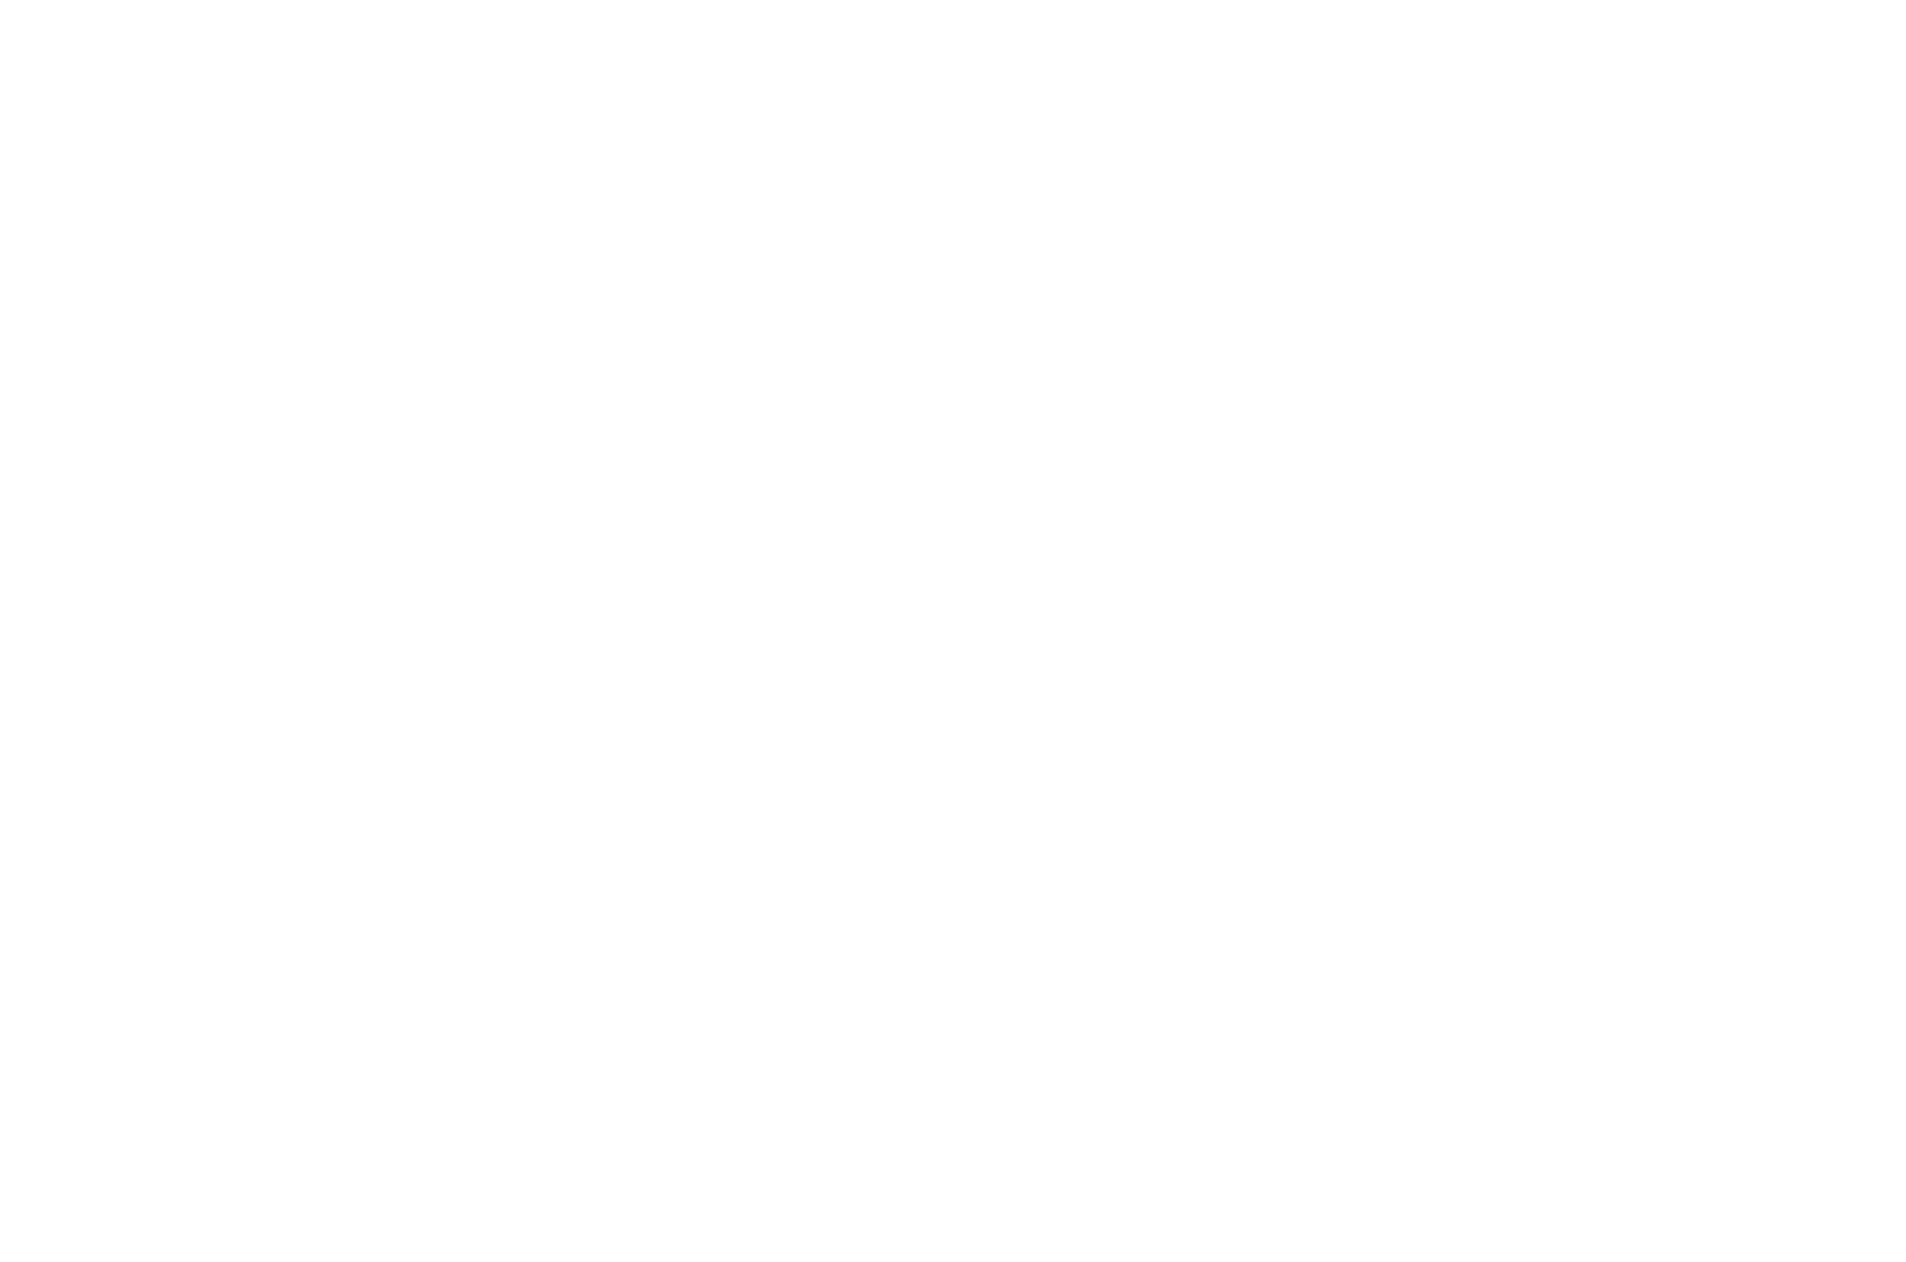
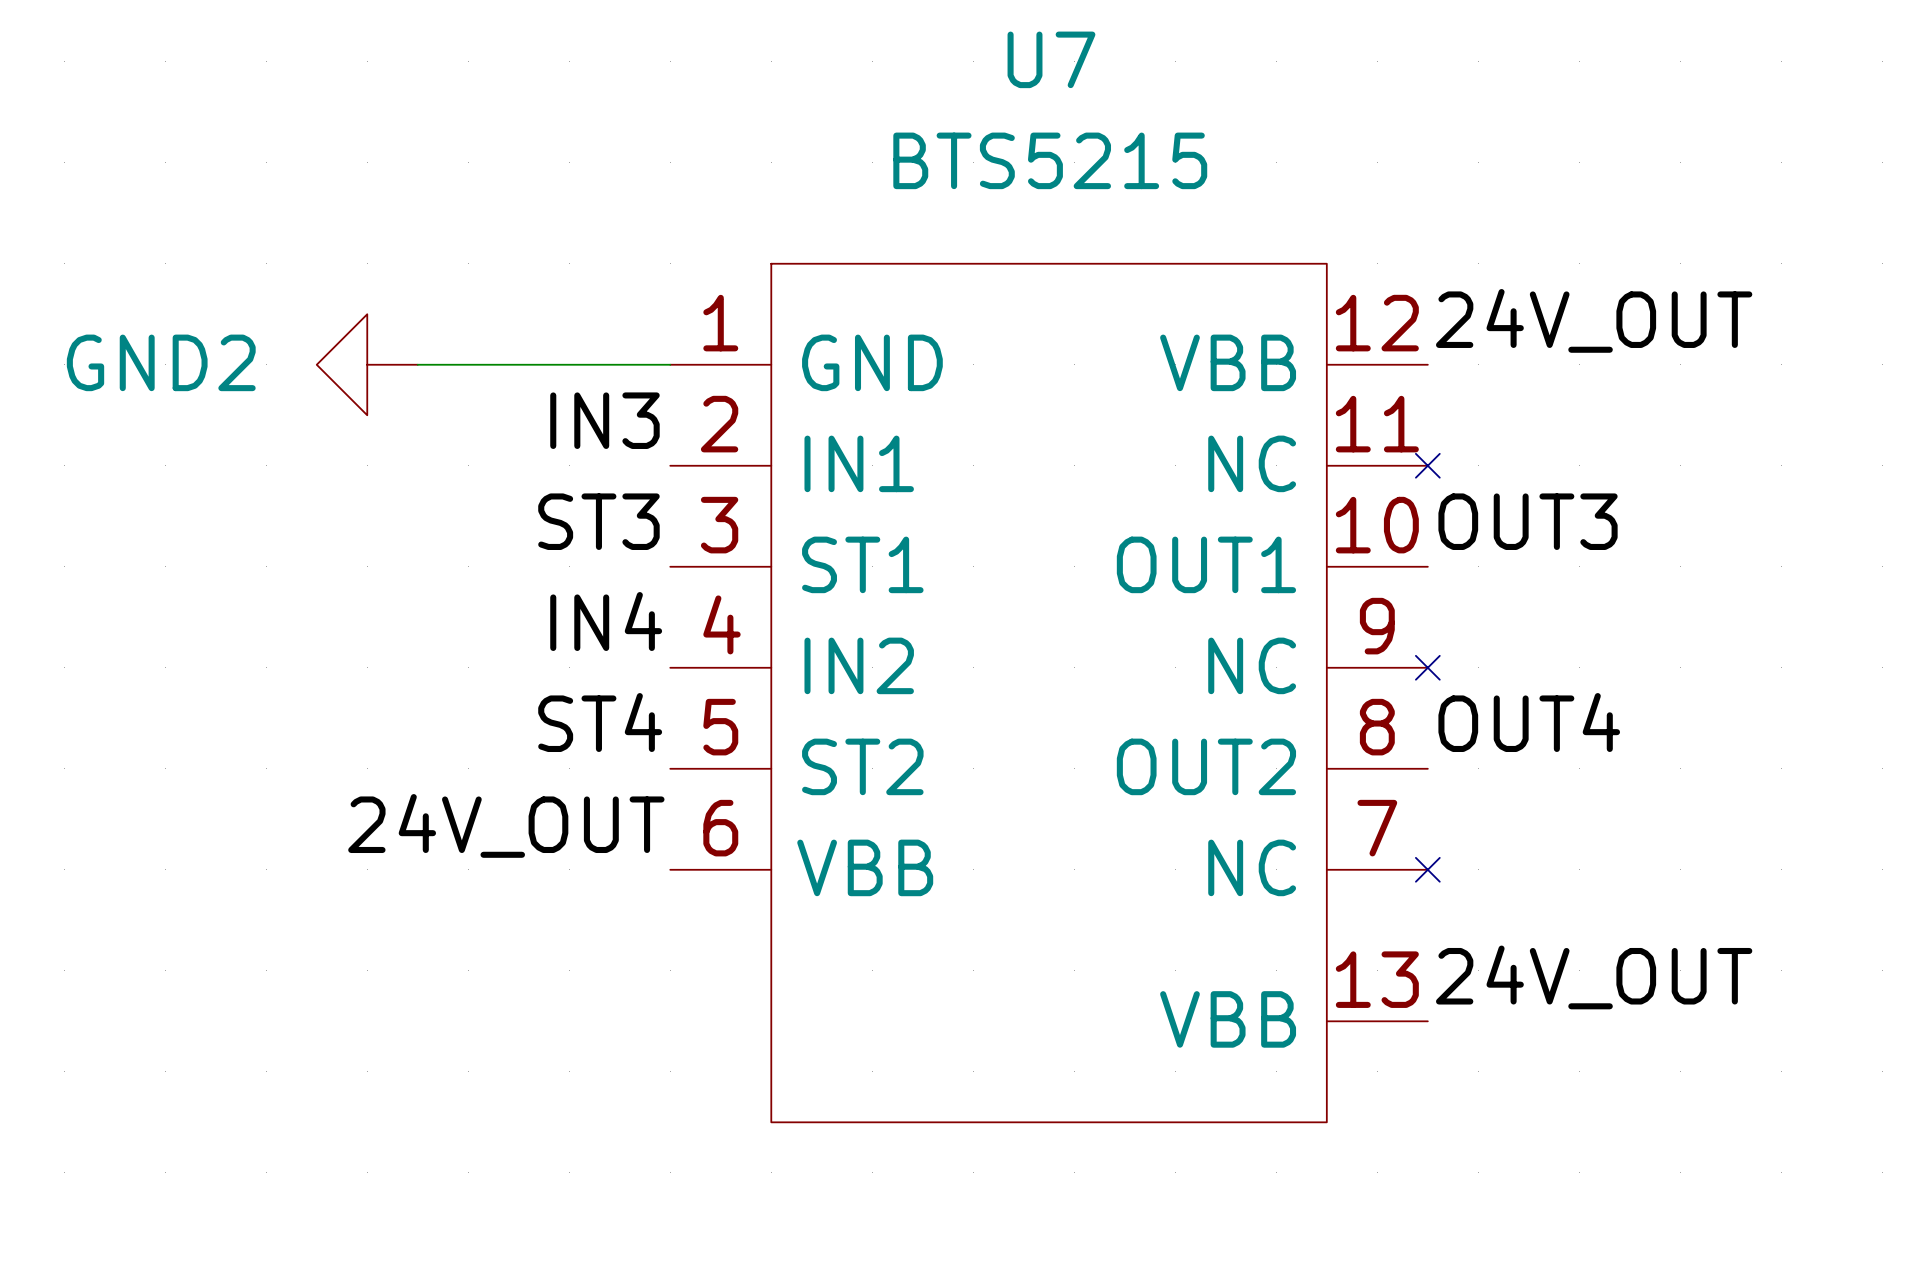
label: none -> 24V_OUT (1594, 320)
power symbol: none -> GND2 (367, 364)
wire: none -> (417, 364) (670, 364)
label: none -> IN3 (604, 420)
label: none -> ST3 (598, 521)
label: none -> OUT3 (1528, 521)
label: none -> IN4 (606, 621)
U7: none -> BTS5215 (1055, 693)
label: none -> ST4 (600, 722)
label: none -> OUT4 (1529, 722)
label: none -> 24V_OUT (506, 825)
label: none -> 24V_OUT (1594, 977)

